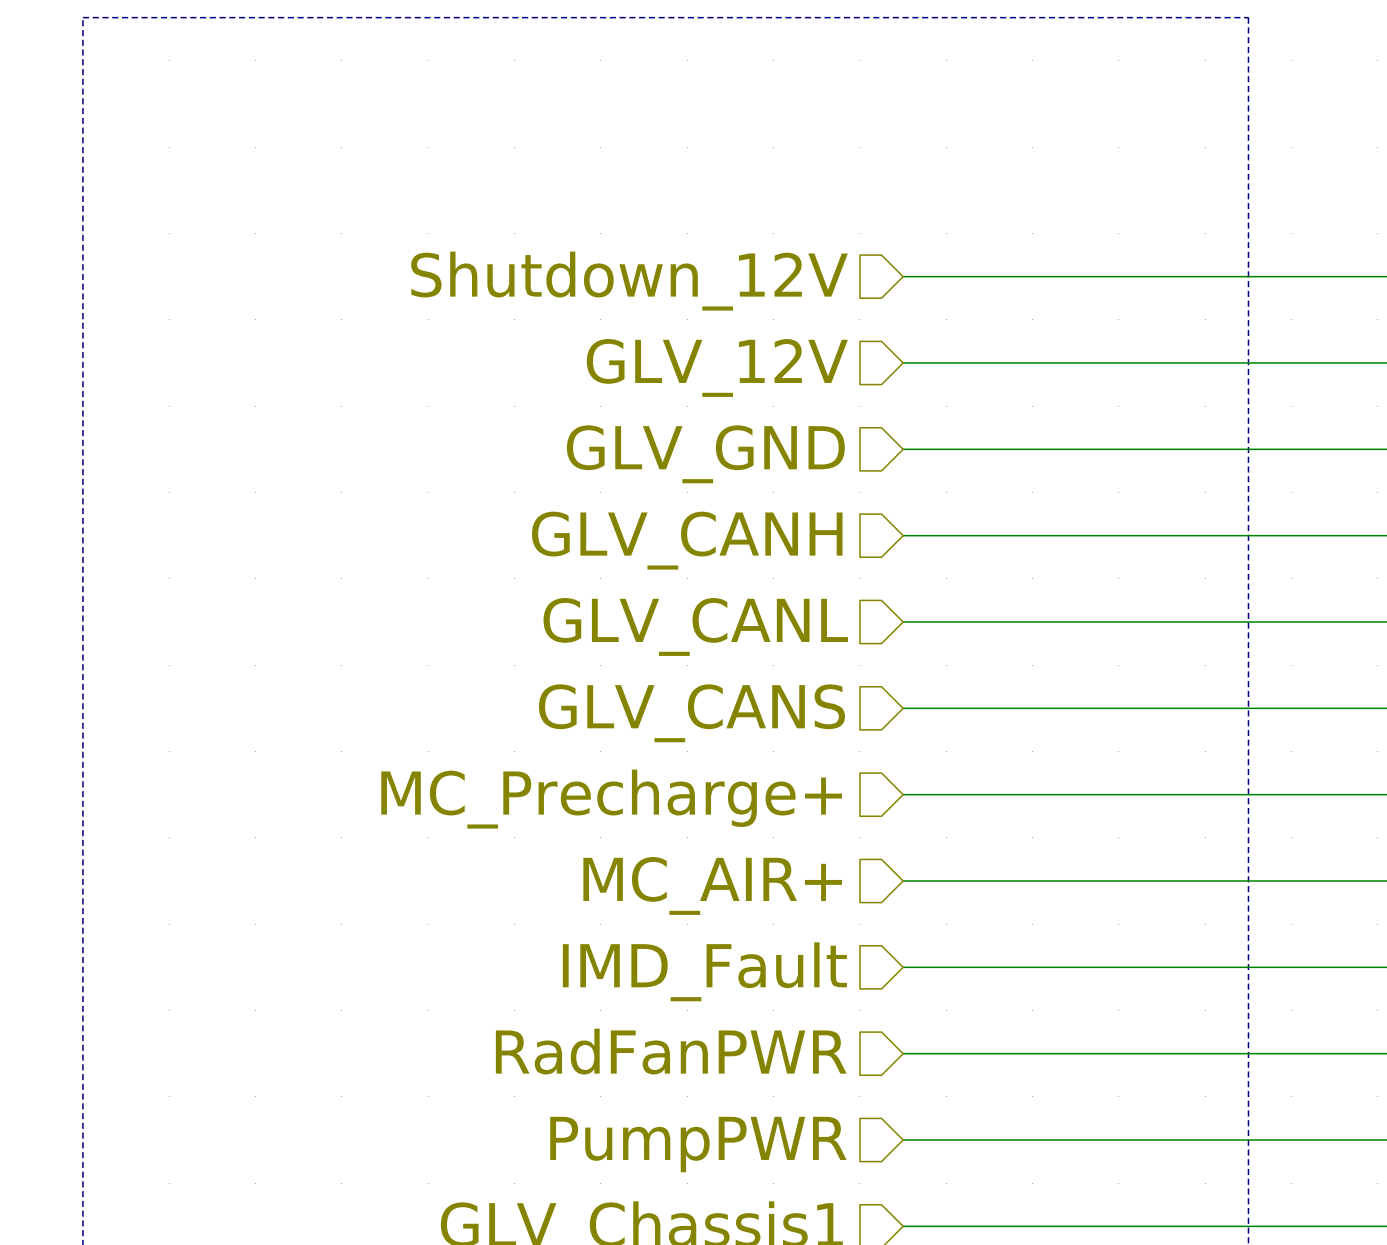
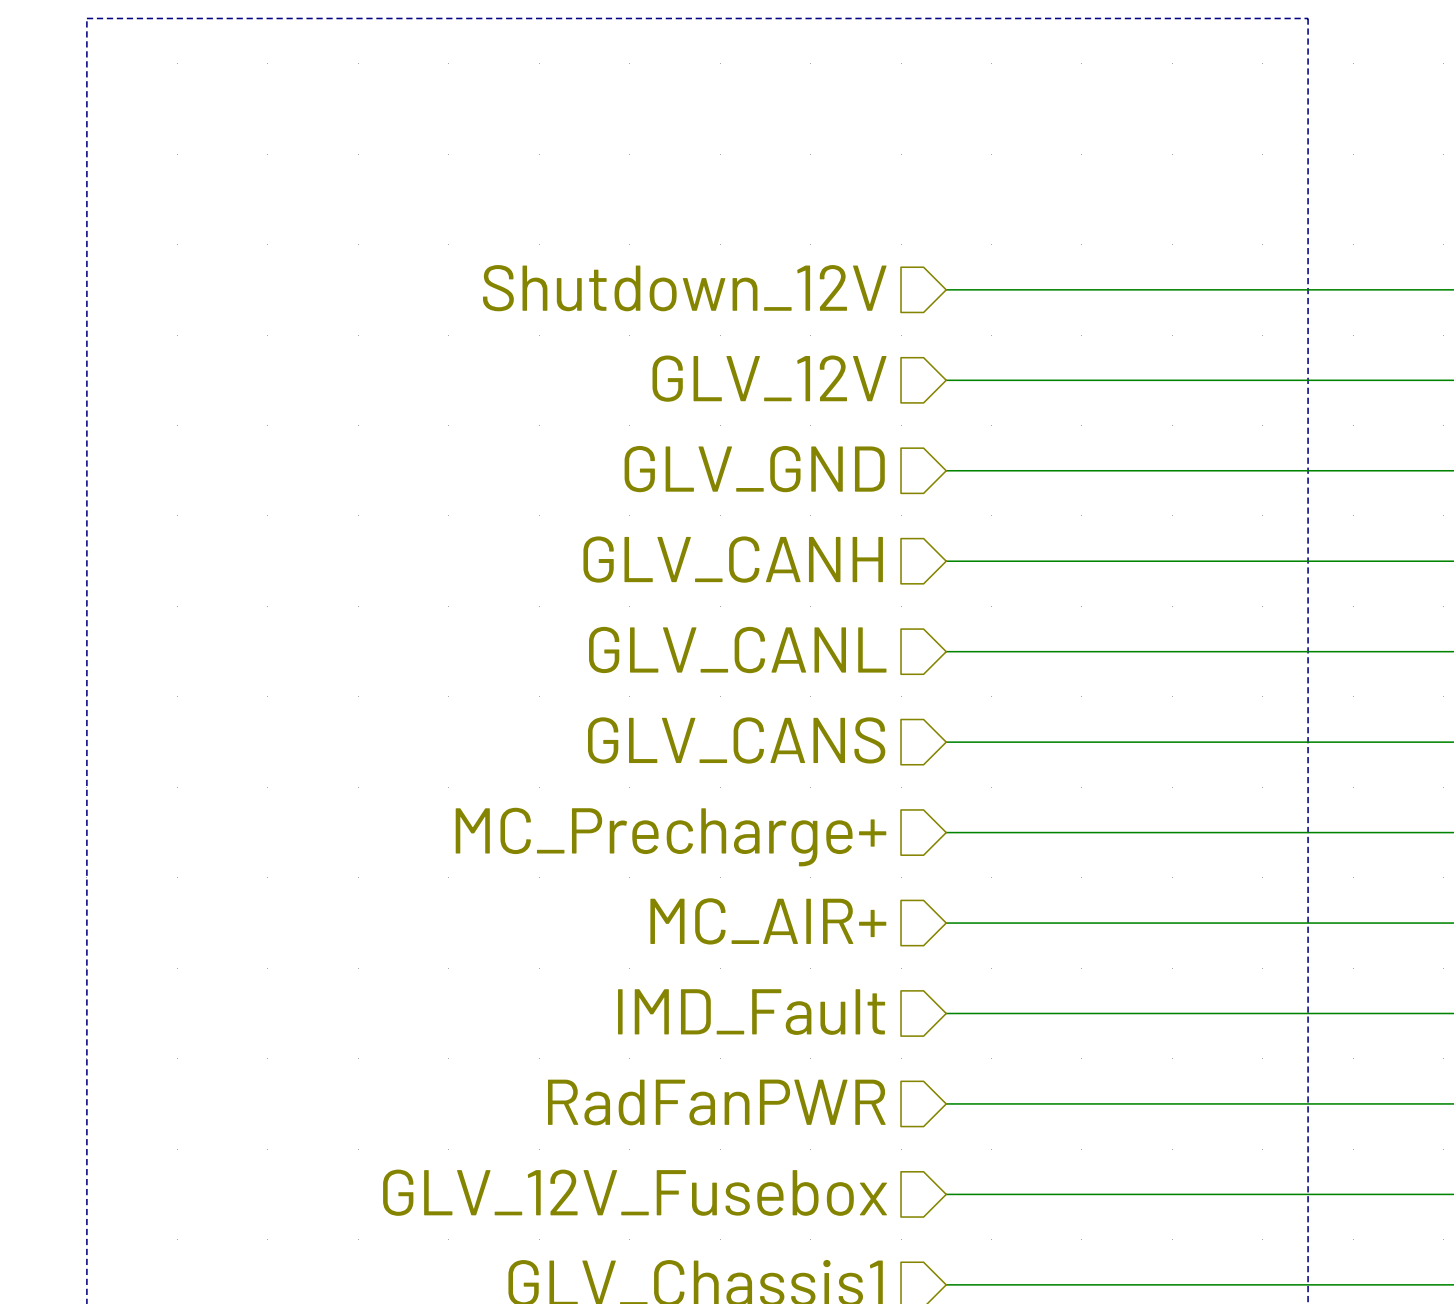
hierarchical label: PumpPWR (698, 1144) -> GLV_12V_Fusebox (635, 1192)

